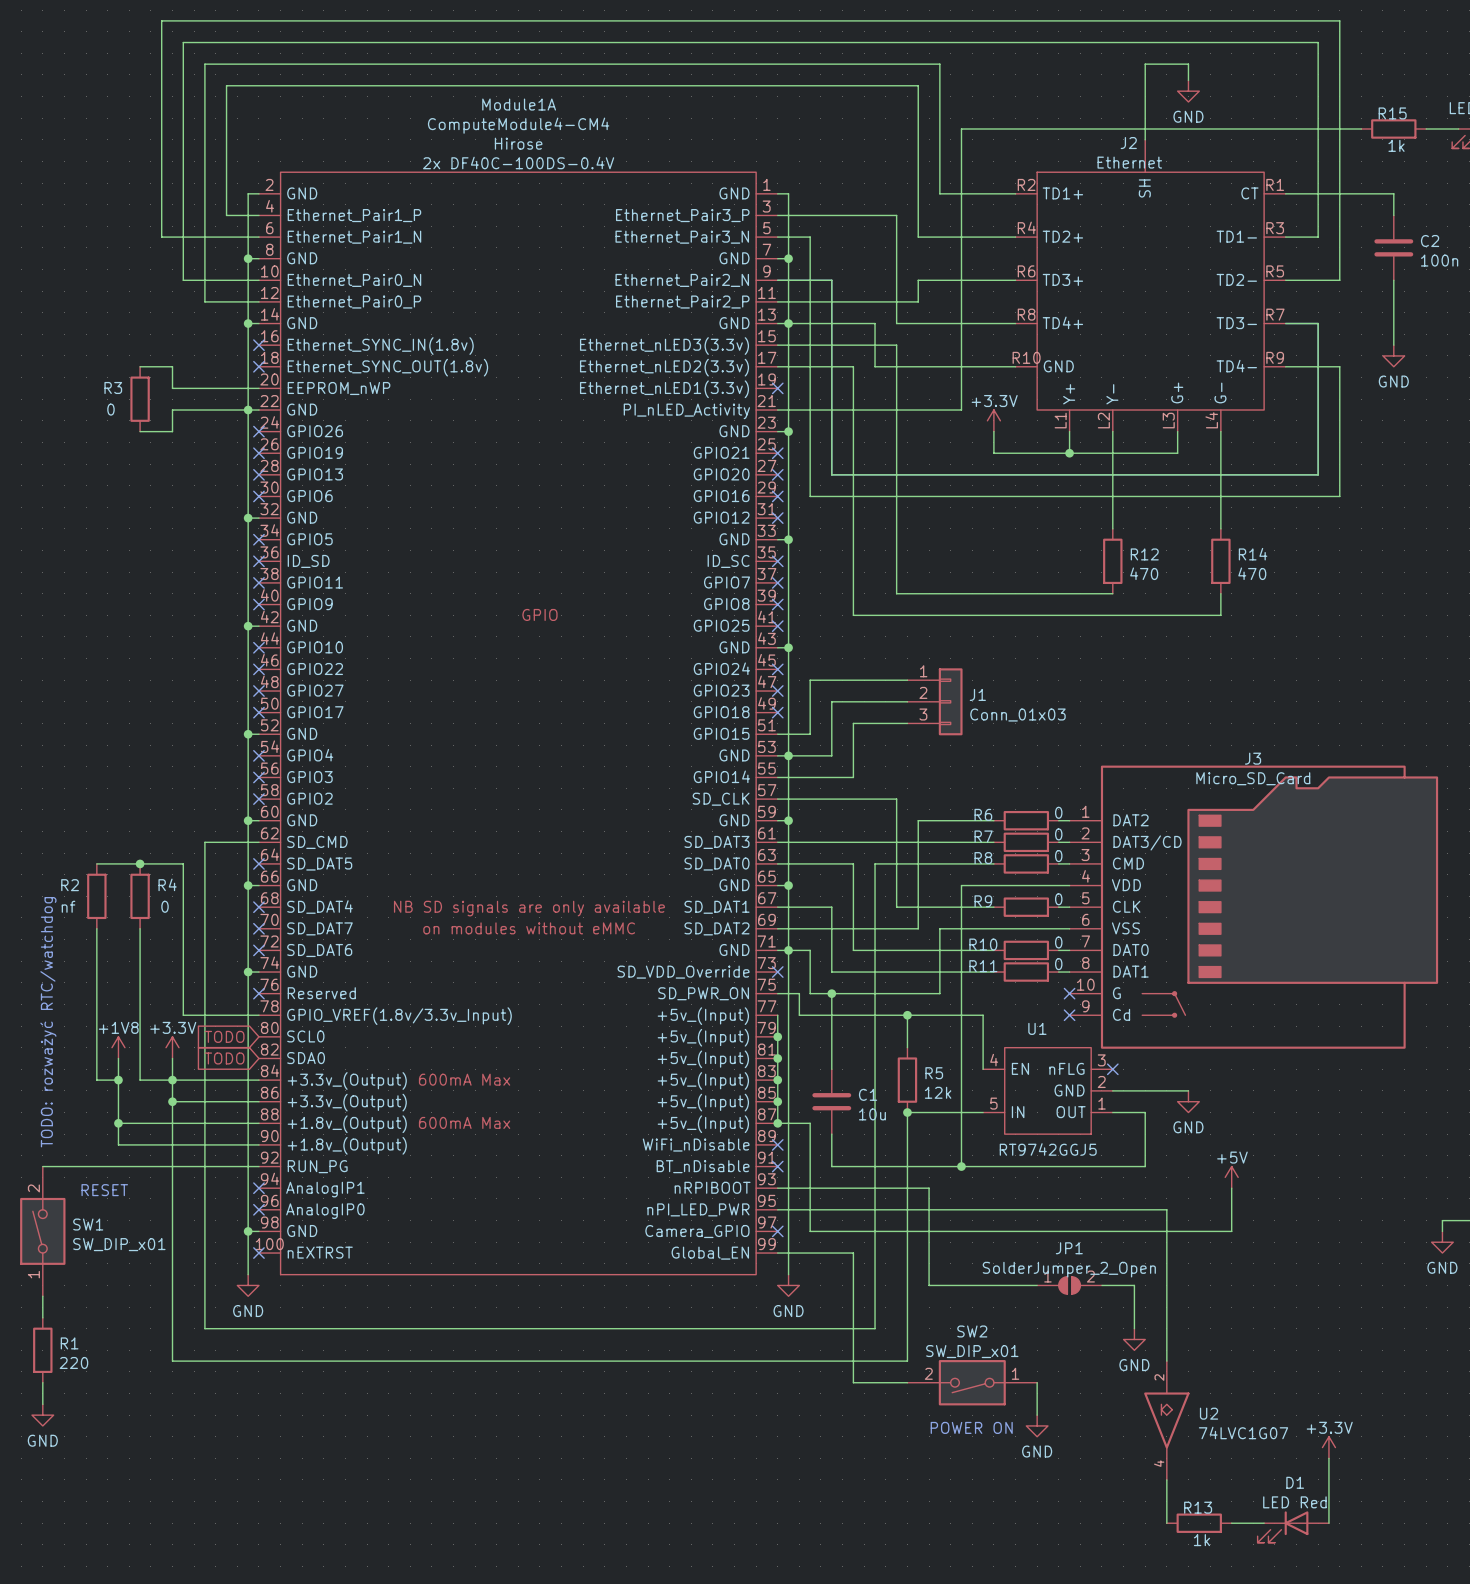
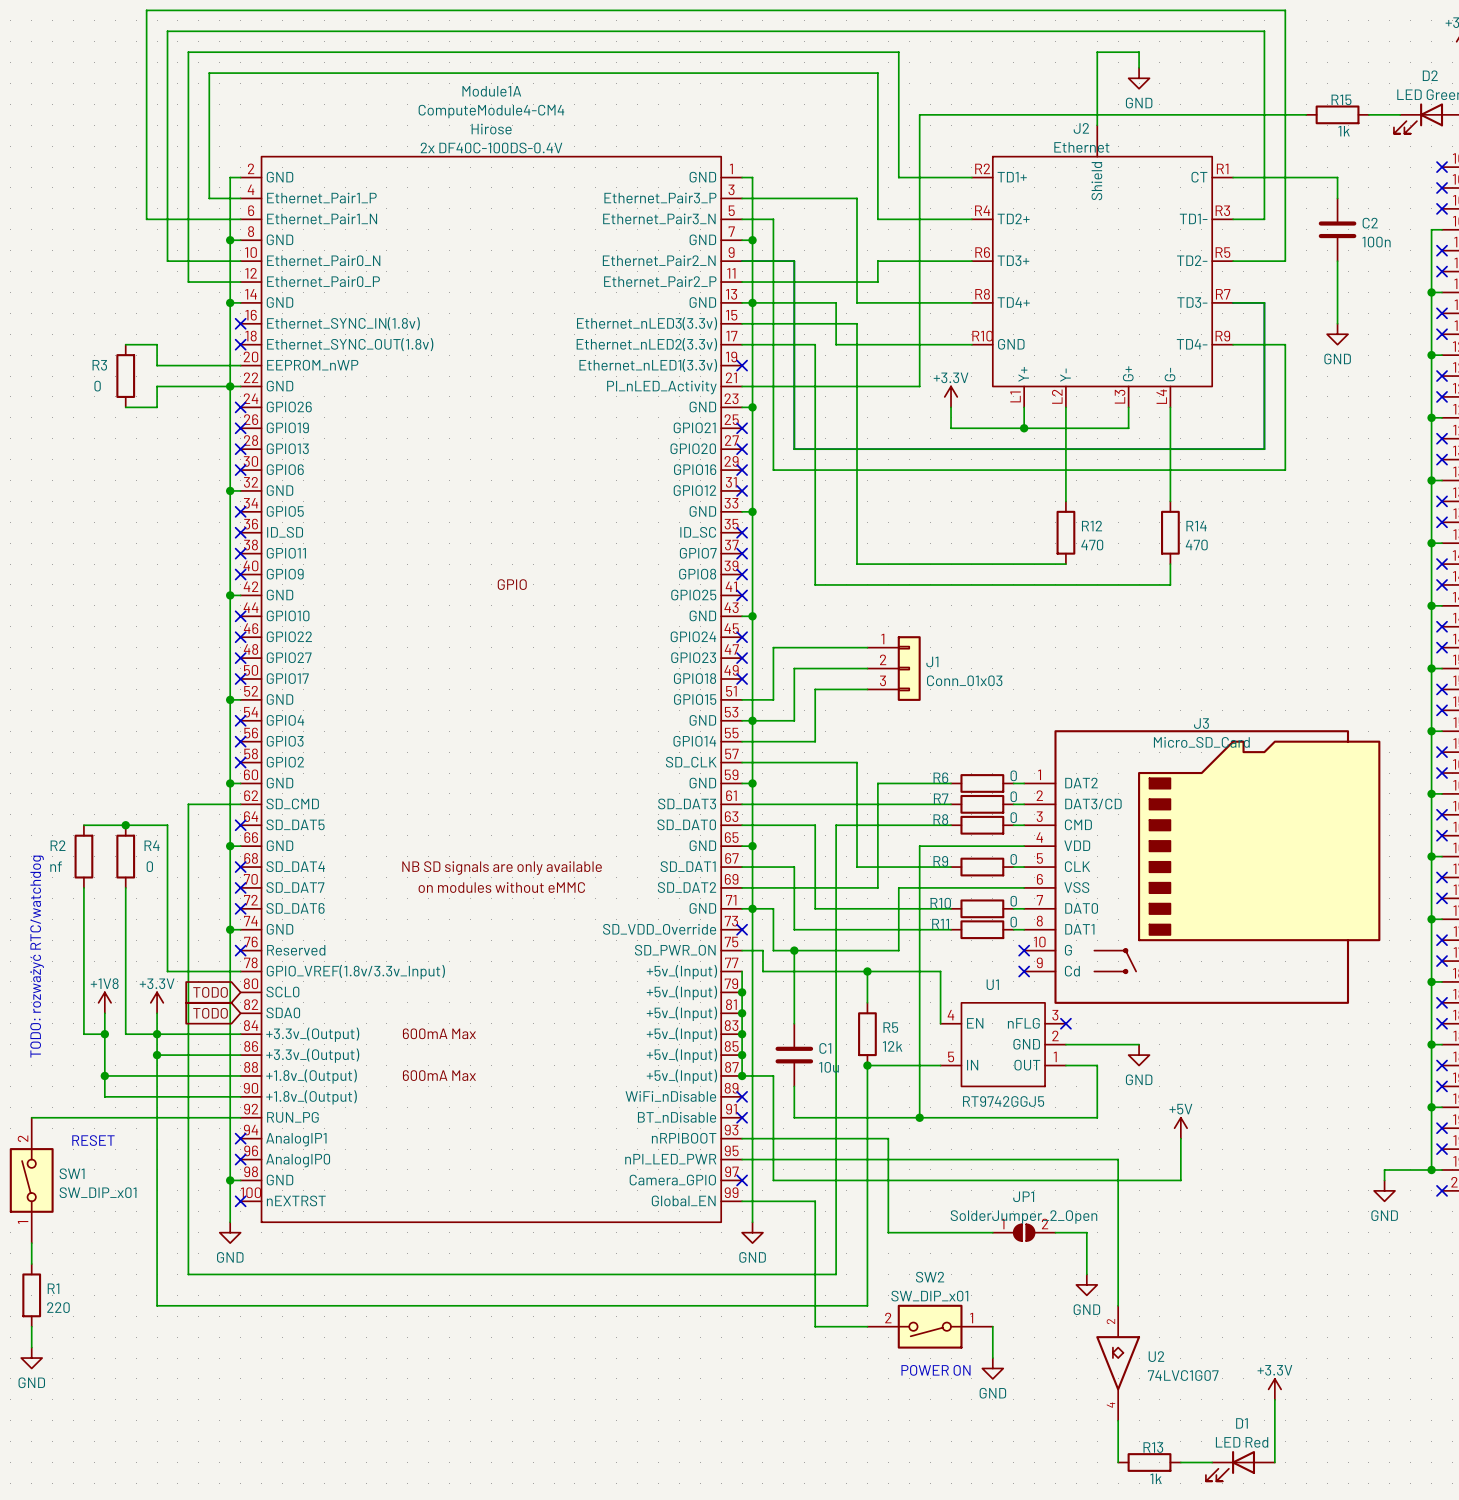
J2 pin name: SH (1144, 188) -> Shield (1096, 181)

